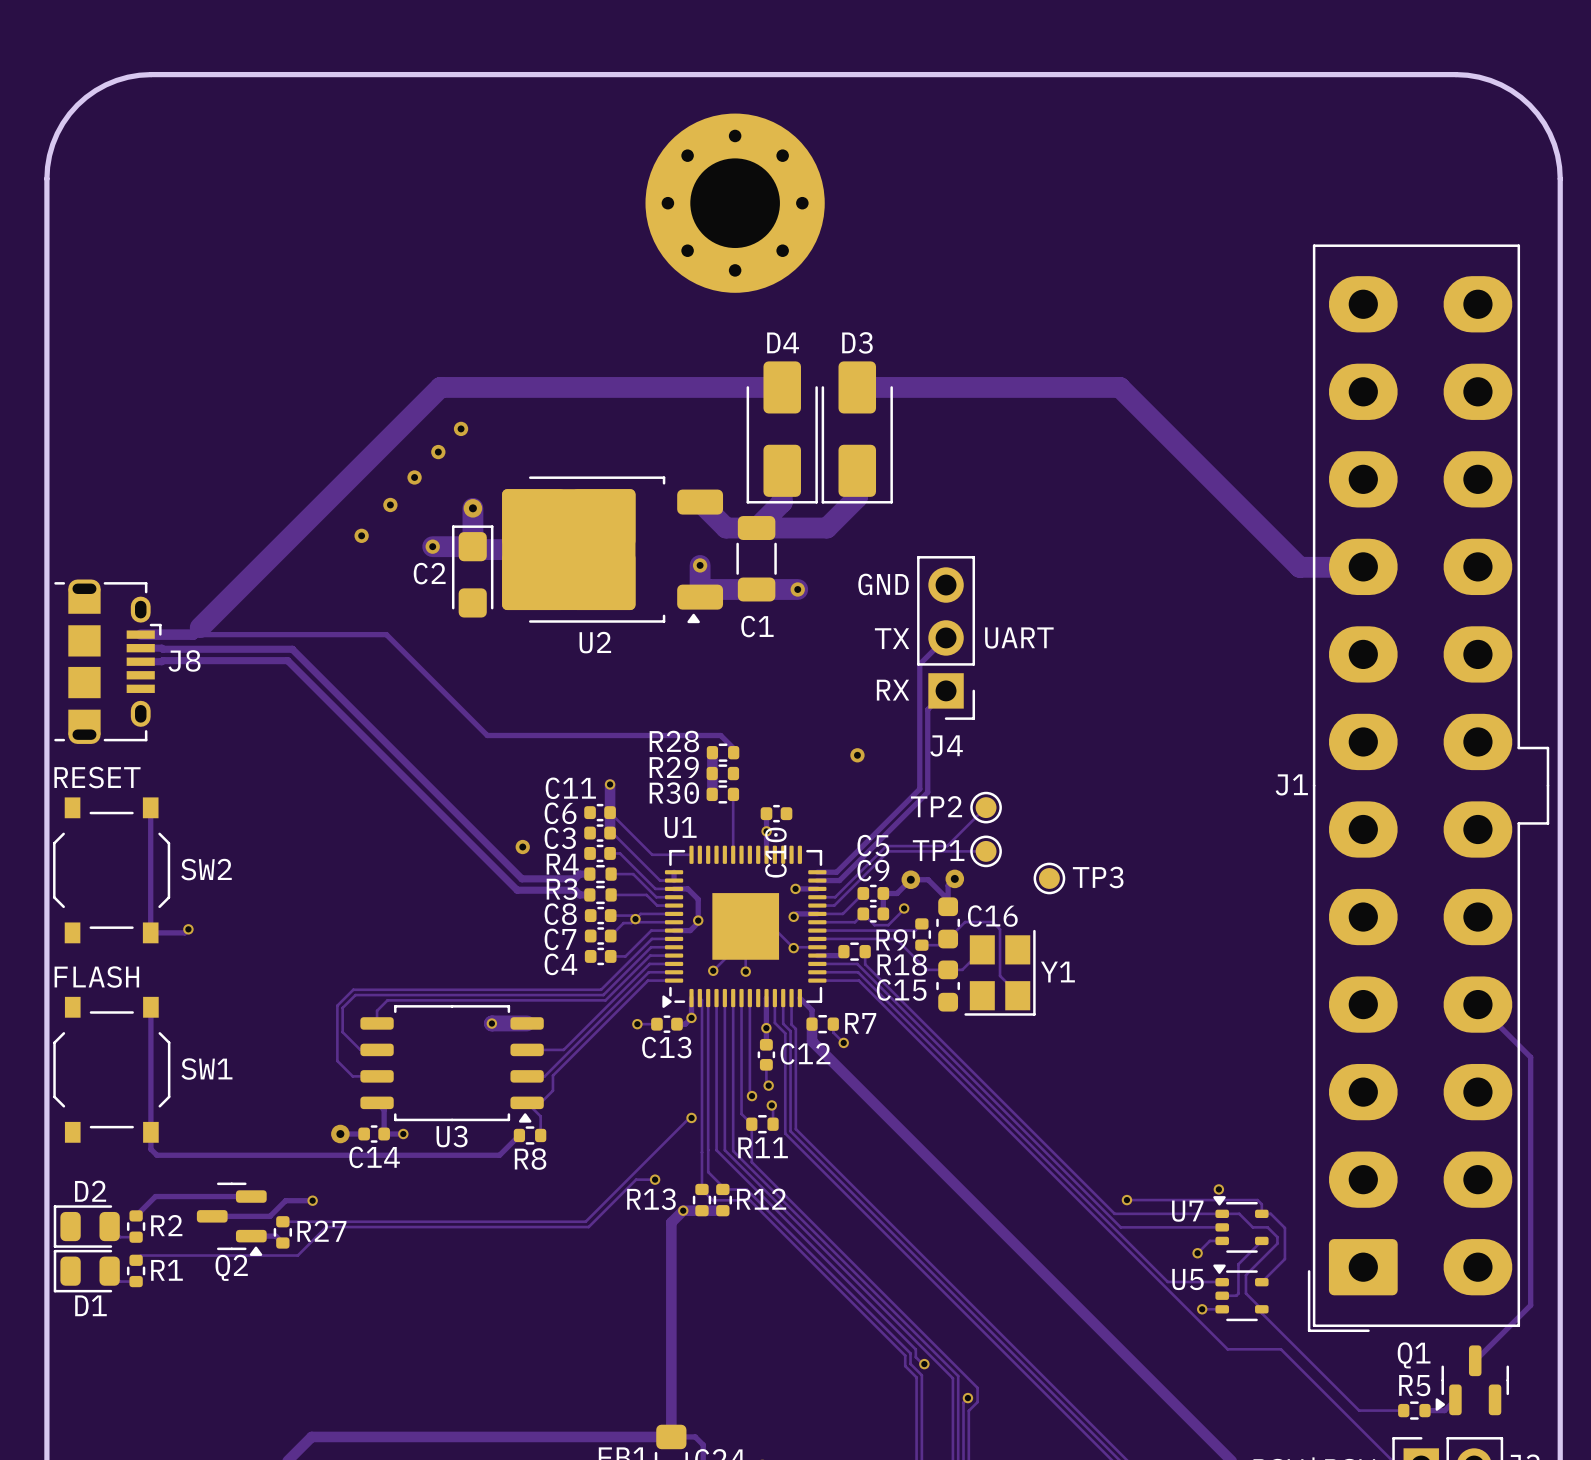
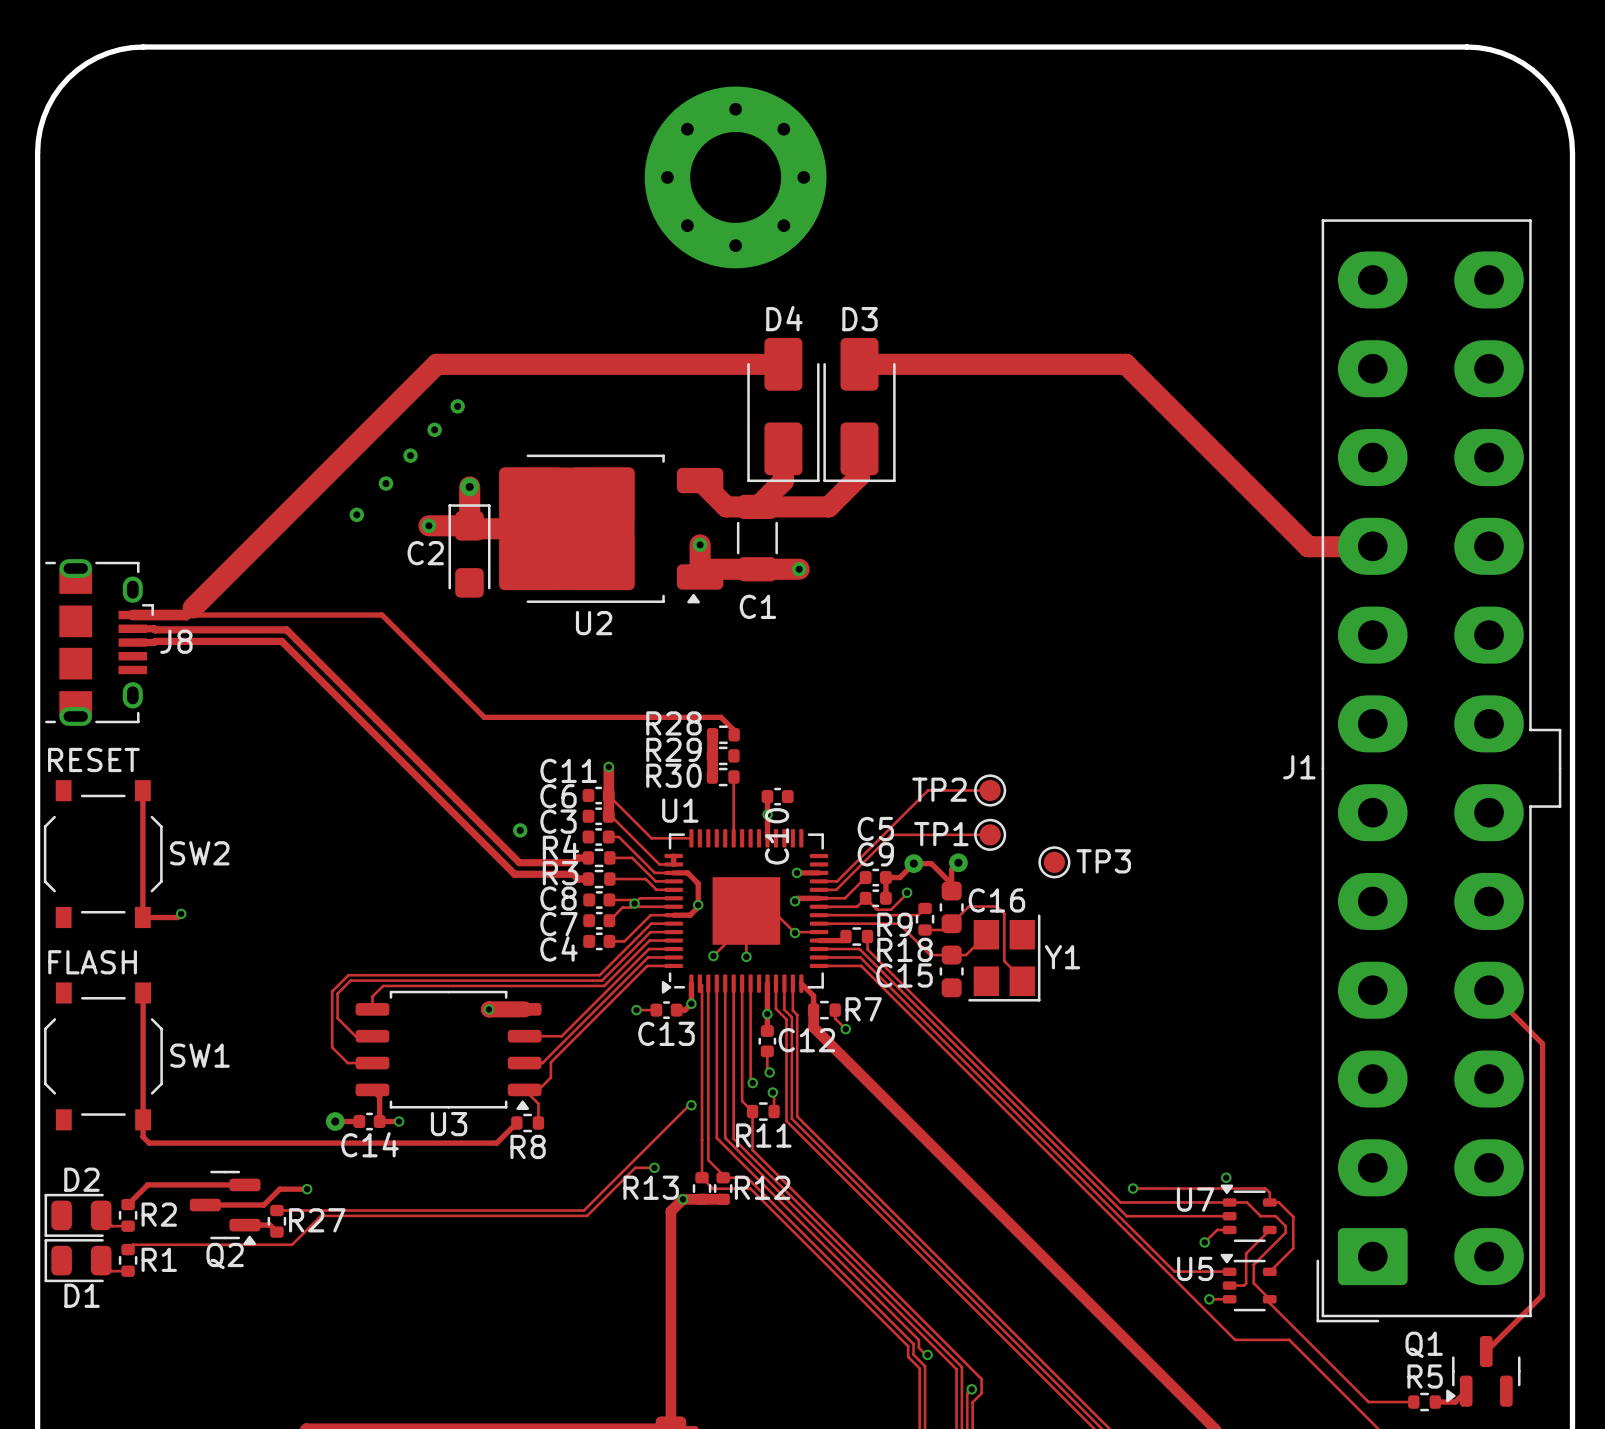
text: GND (883, 584) -> none
track: (946, 637) (919, 664) (919, 789) (836, 872) (817, 872) -> none
J4: (946, 637) -> none
text: UART (1019, 637) -> none
text: TX (892, 638) -> none
text: RX (893, 690) -> none
track: (946, 691) (927, 709) (927, 792) (839, 880) (817, 880) -> none
via: (857, 755) -> none
track: (985, 807) (947, 846) (886, 846) -> (989, 790) (928, 790) (888, 829)

